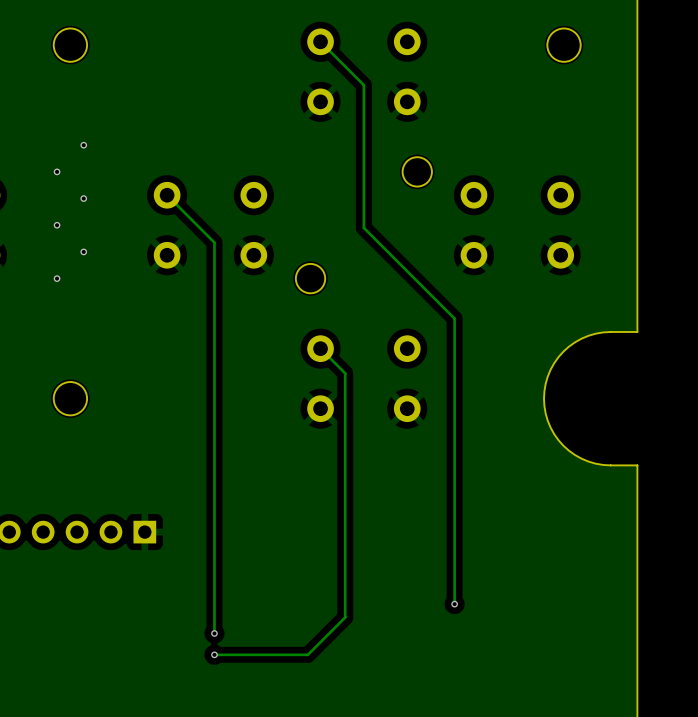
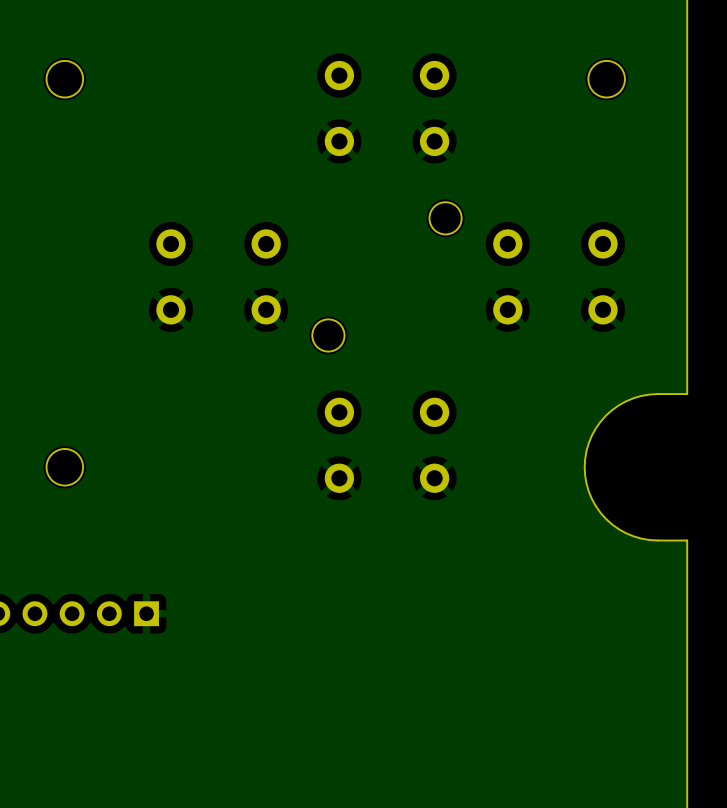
track: (320, 41) (363, 85) (363, 227) (454, 318) (454, 604) -> none
via: (83, 145) -> none
via: (57, 171) -> none
track: (167, 195) (214, 242) (214, 633) -> none
via: (83, 198) -> none
via: (57, 225) -> none
via: (83, 251) -> none
via: (57, 278) -> none
track: (320, 348) (345, 373) (345, 617) (307, 654) (214, 654) -> none
via: (454, 604) -> none
via: (214, 633) -> none
via: (214, 654) -> none

